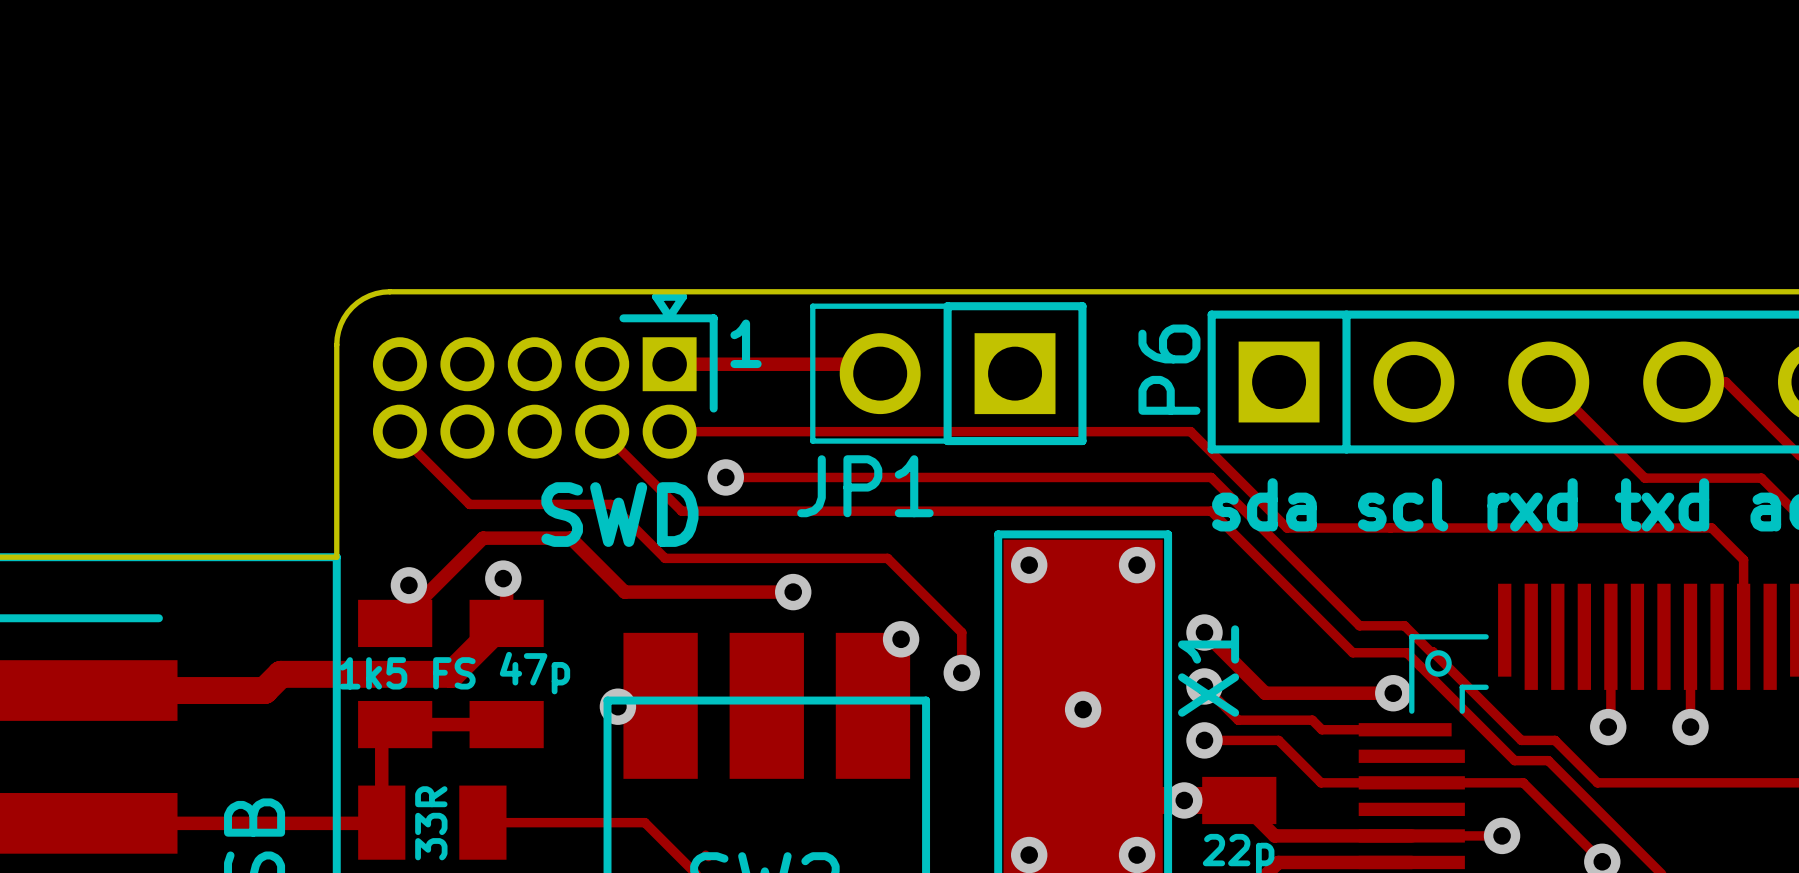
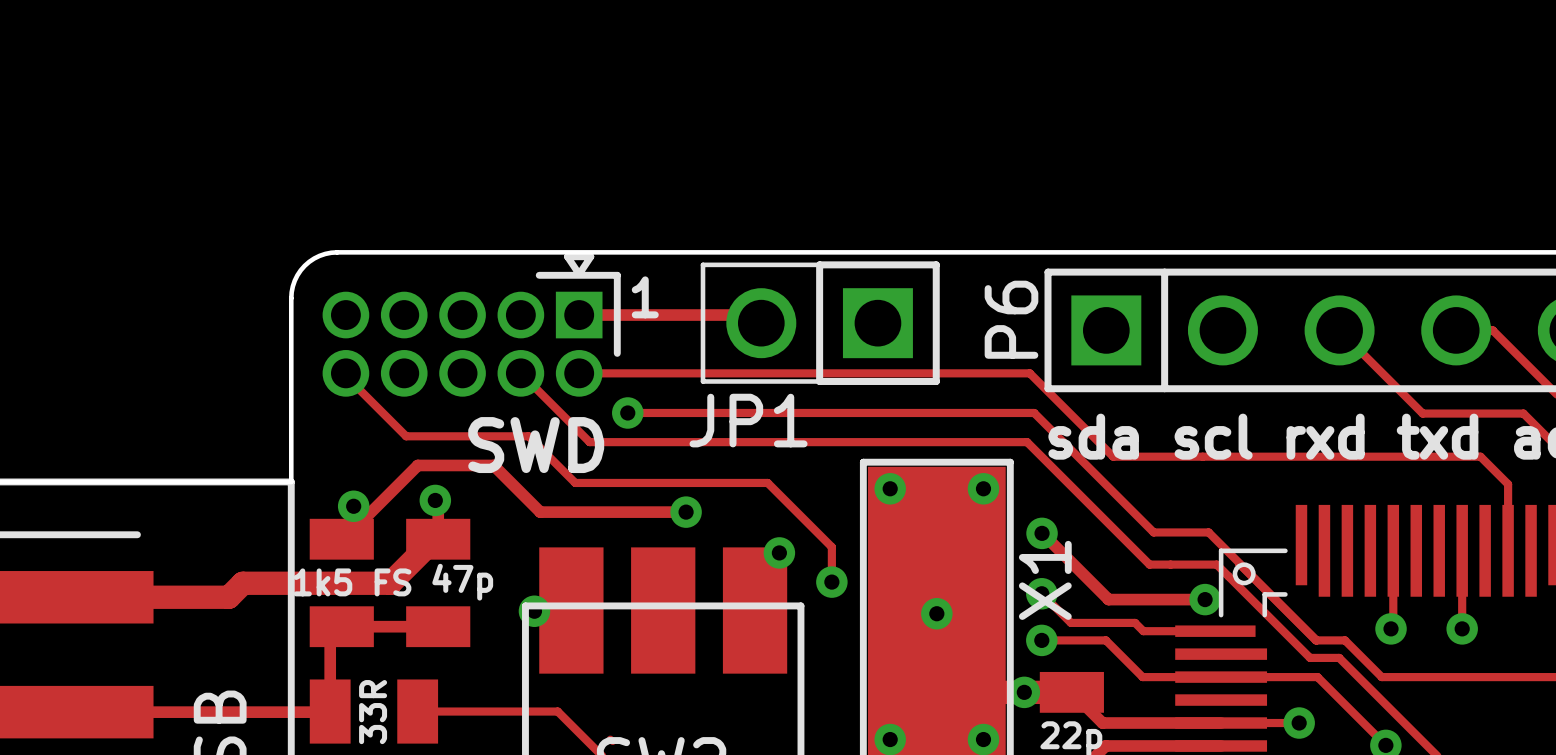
track: (1195, 477) (1211, 477) (1359, 625) (1404, 625) (1432, 653) (1432, 651) -> (1034, 412) (1153, 532) (1208, 532) (1316, 640)
track: (1187, 511) (1211, 511) (1352, 652) -> (1027, 442) (1149, 564) (1170, 564)
track: (1204, 632) (1265, 693) (1281, 693) -> (1042, 533) (1108, 599)
via position: (1204, 632) -> (1042, 533)

